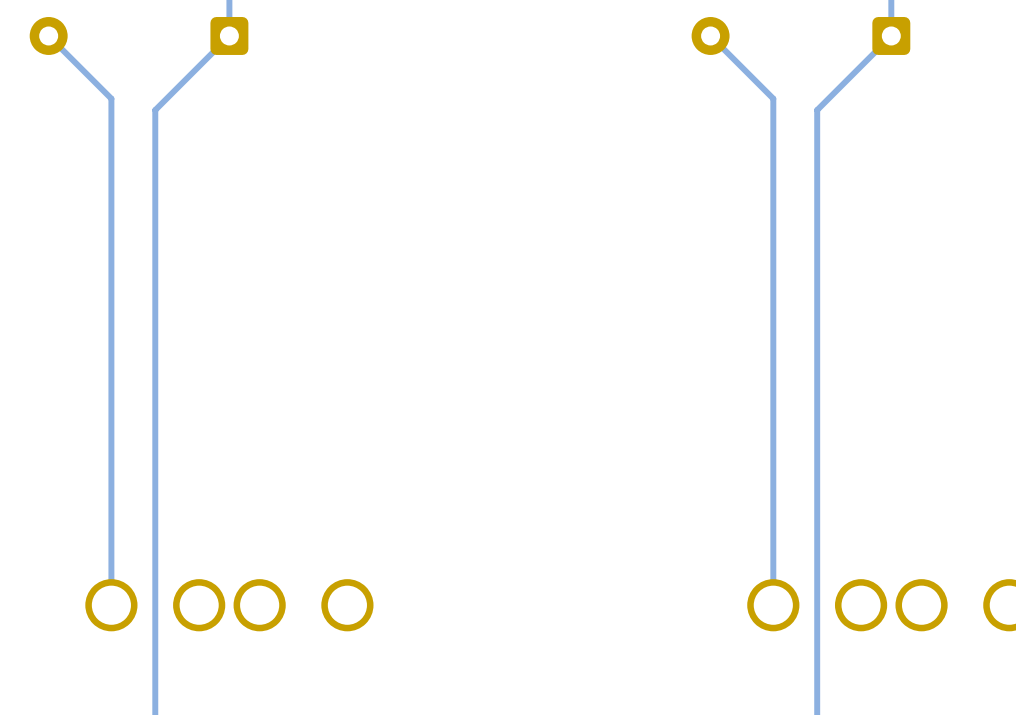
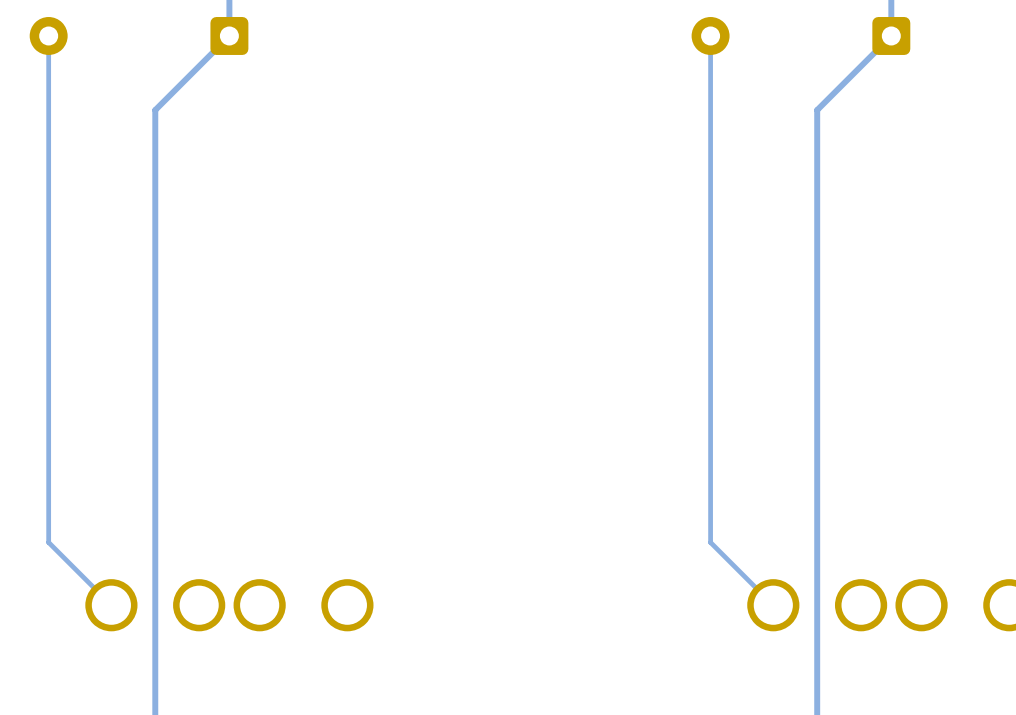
track: (48, 35) (111, 98) (111, 605) -> (48, 35) (48, 542) (111, 605)
track: (710, 35) (773, 98) (773, 605) -> (710, 35) (710, 542) (773, 605)

